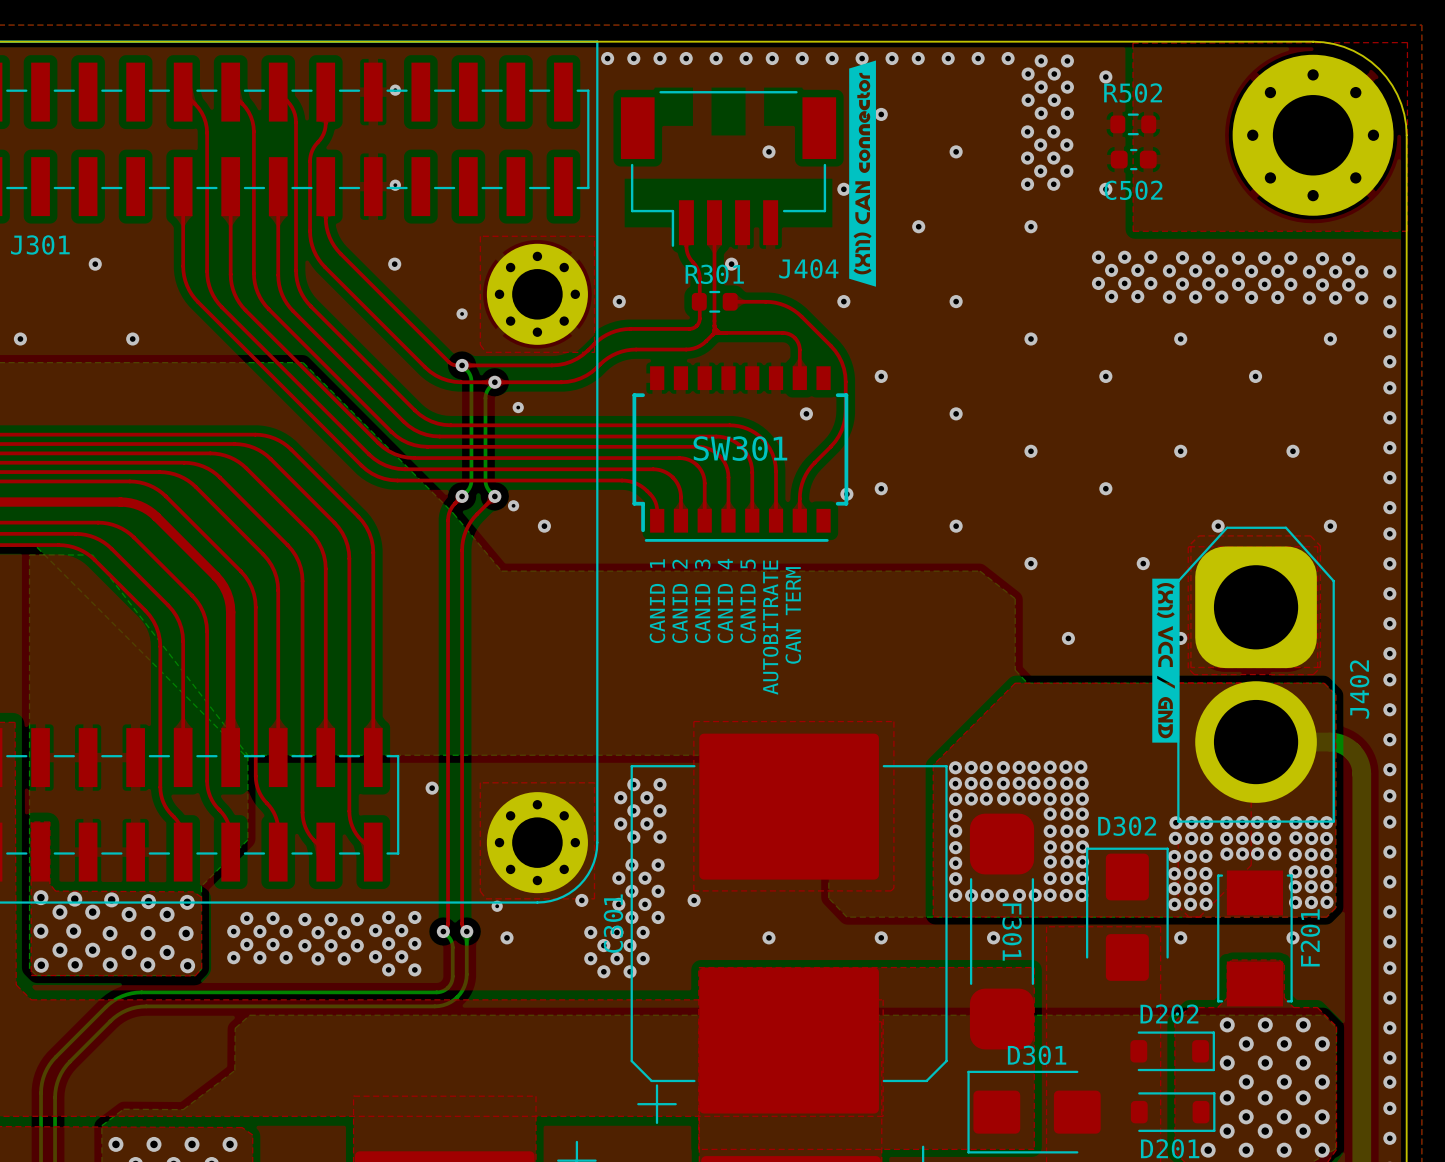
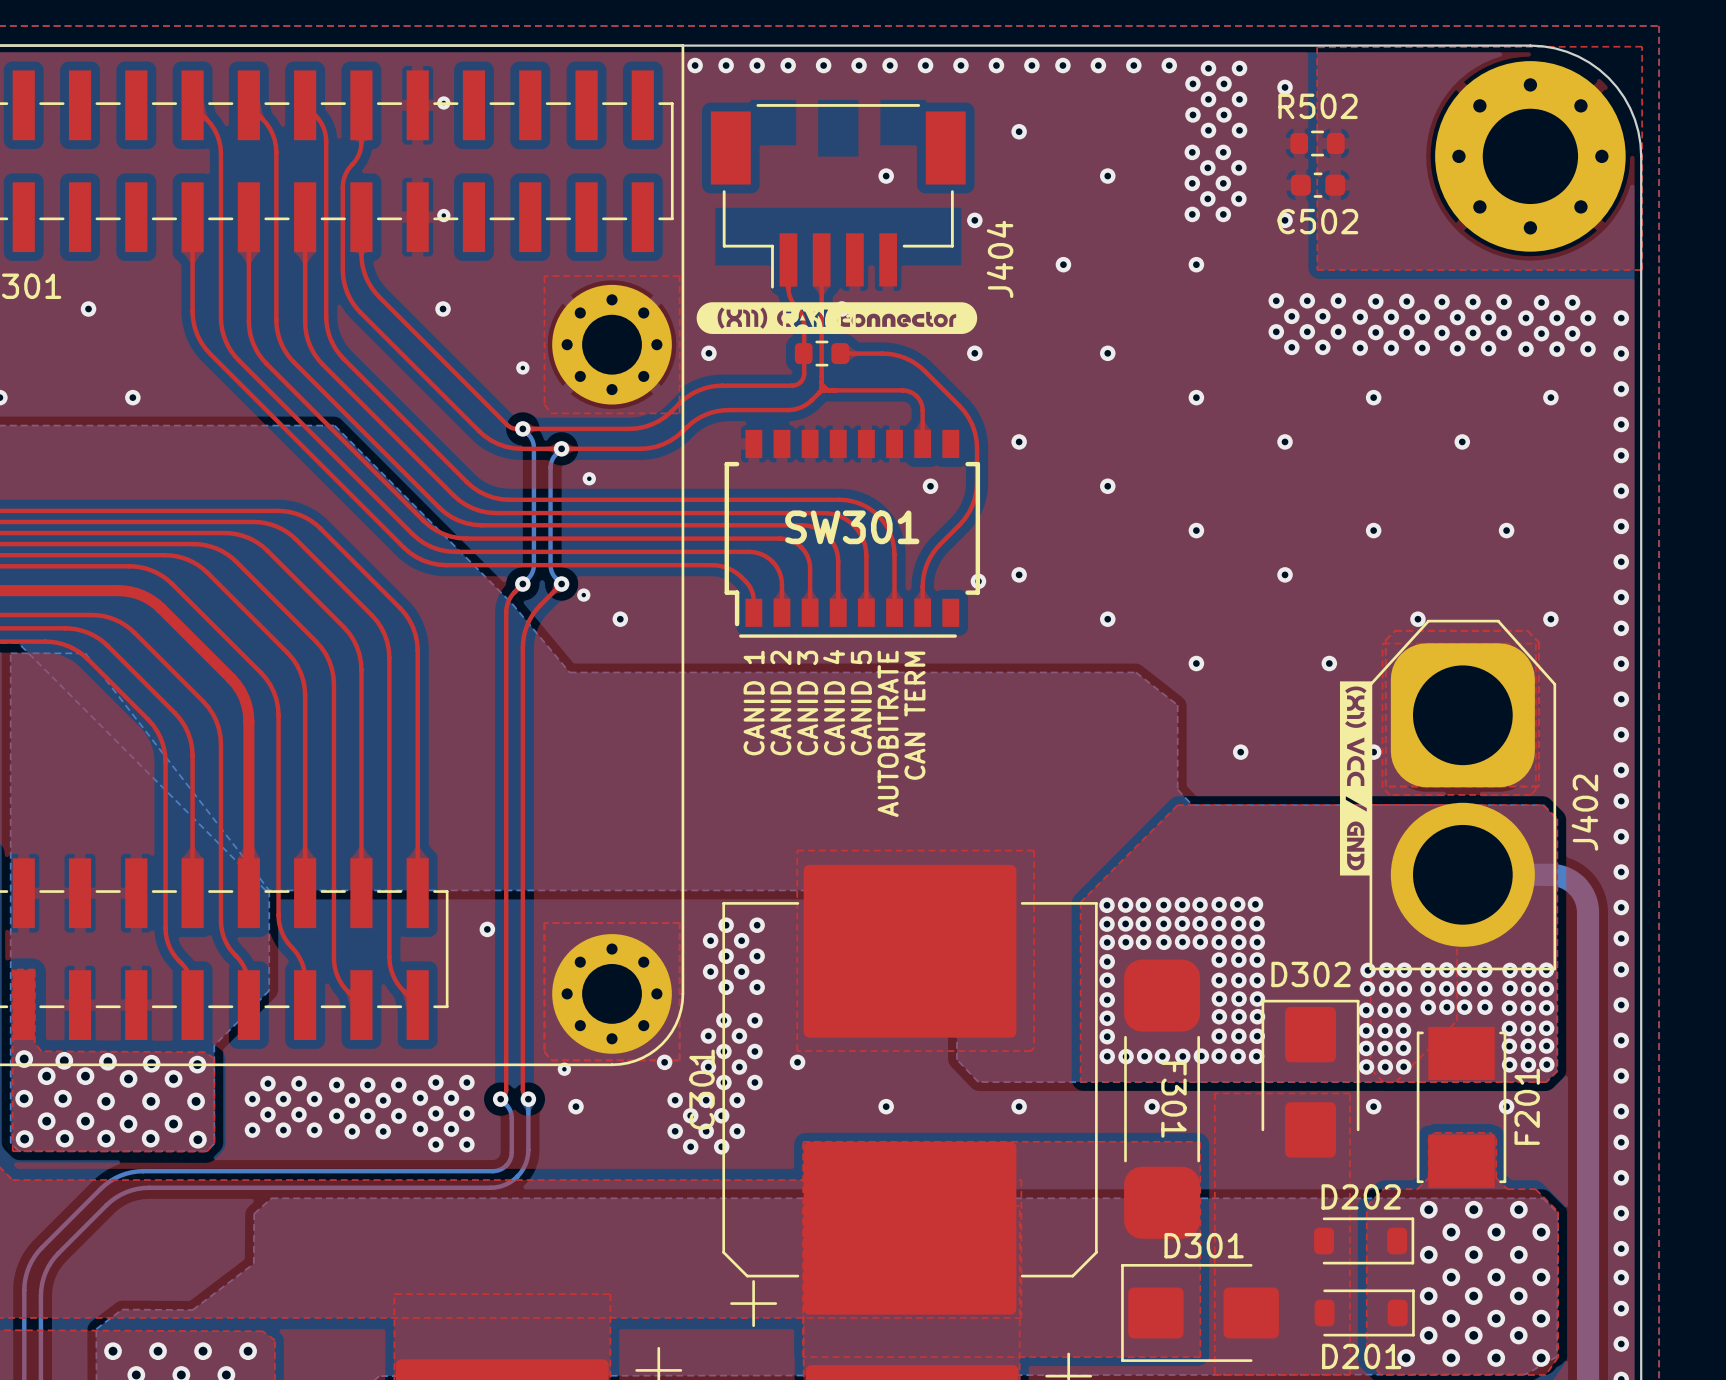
drawing: [849, 60, 876, 287] -> none
drawing: none -> [696, 302, 978, 334]
J404 name rotation: 0° (808, 268) -> 90° counterclockwise (1000, 259)

